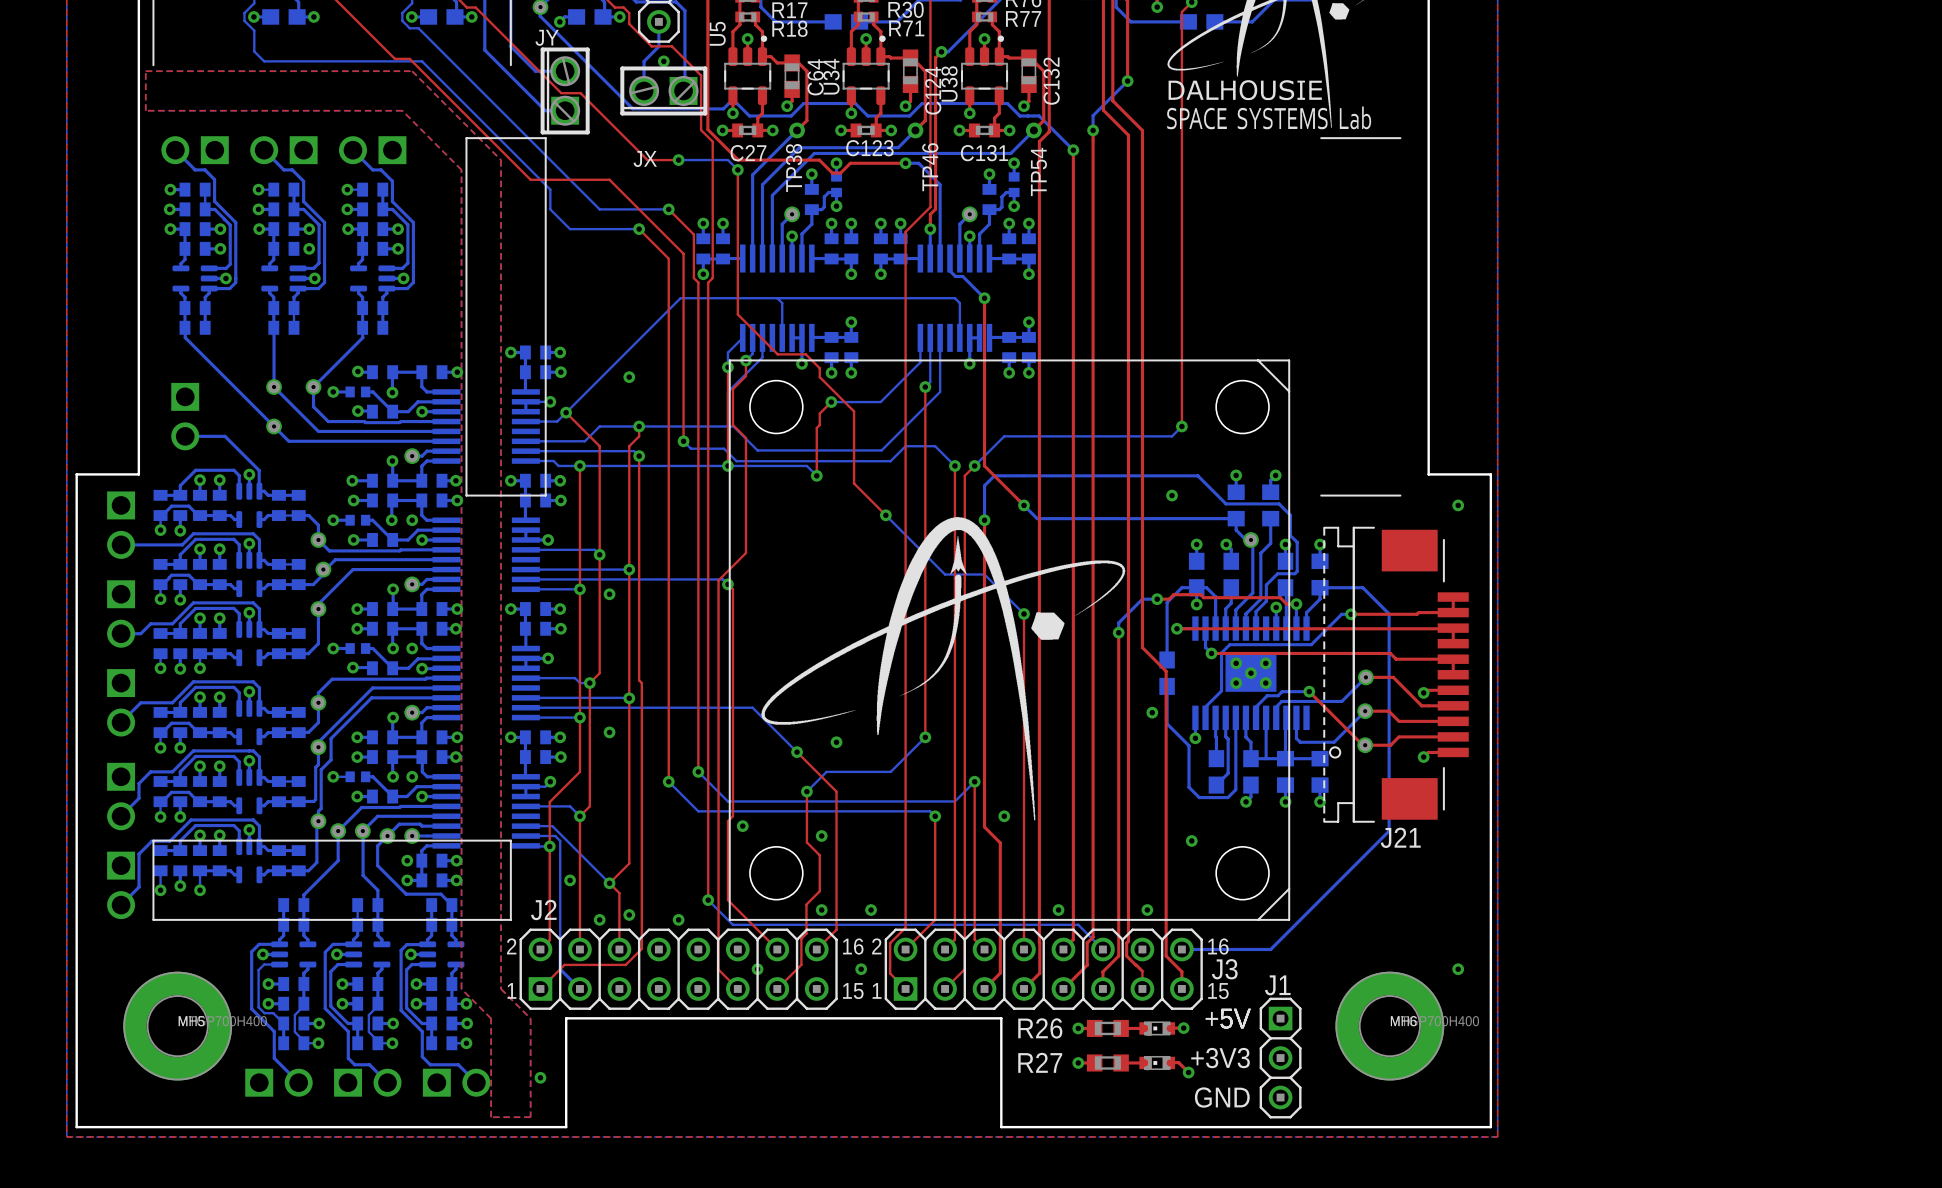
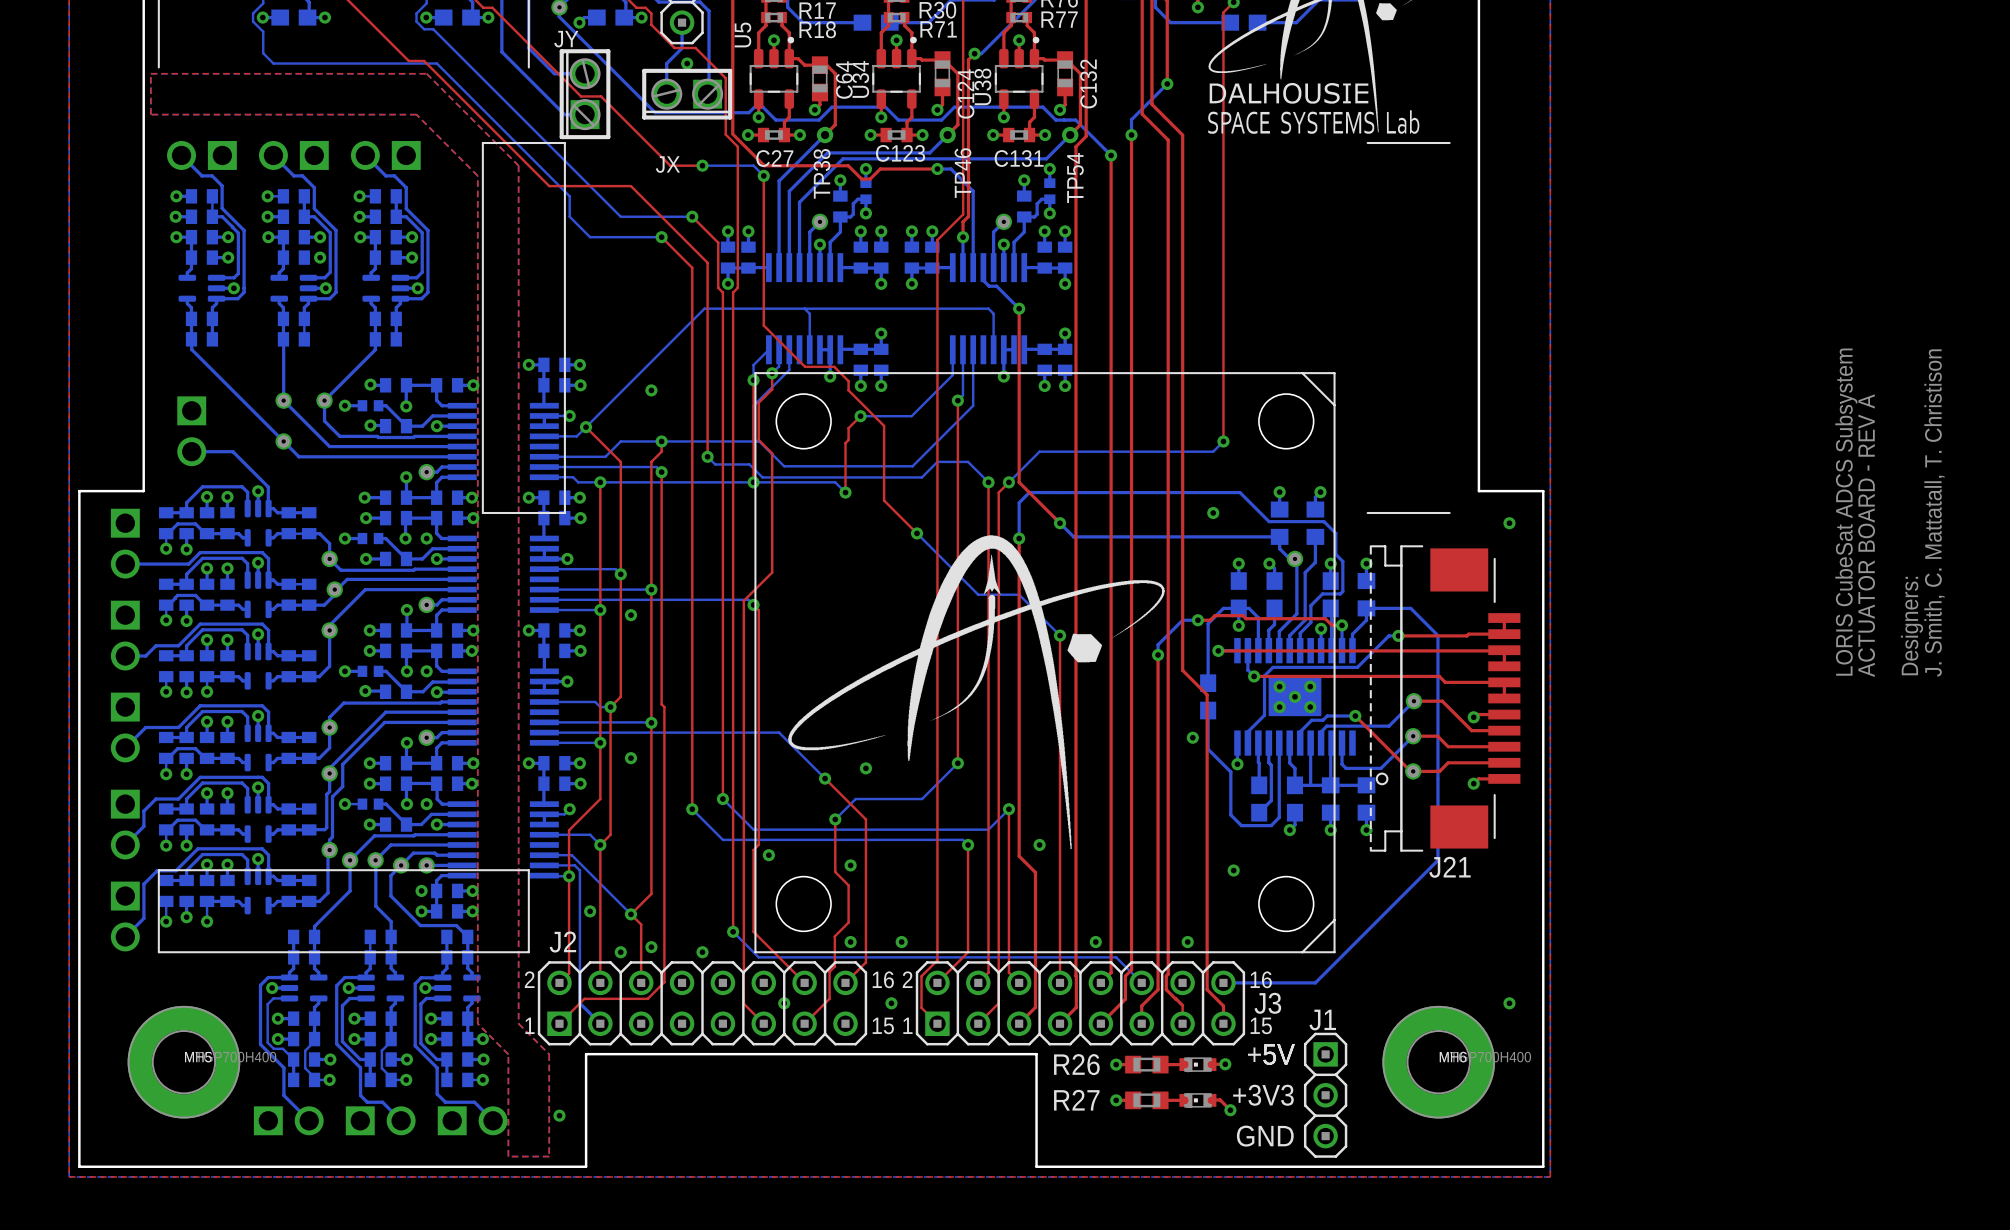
text: none -> LORIS CubeSat ADCS Subsystem (1846, 512)
text: none -> J. Smith, C. Mattatall, T. Christison (1934, 513)
text: none -> ACTUATOR BOARD - REV A (1866, 535)
text: none -> Designers: (1911, 626)

